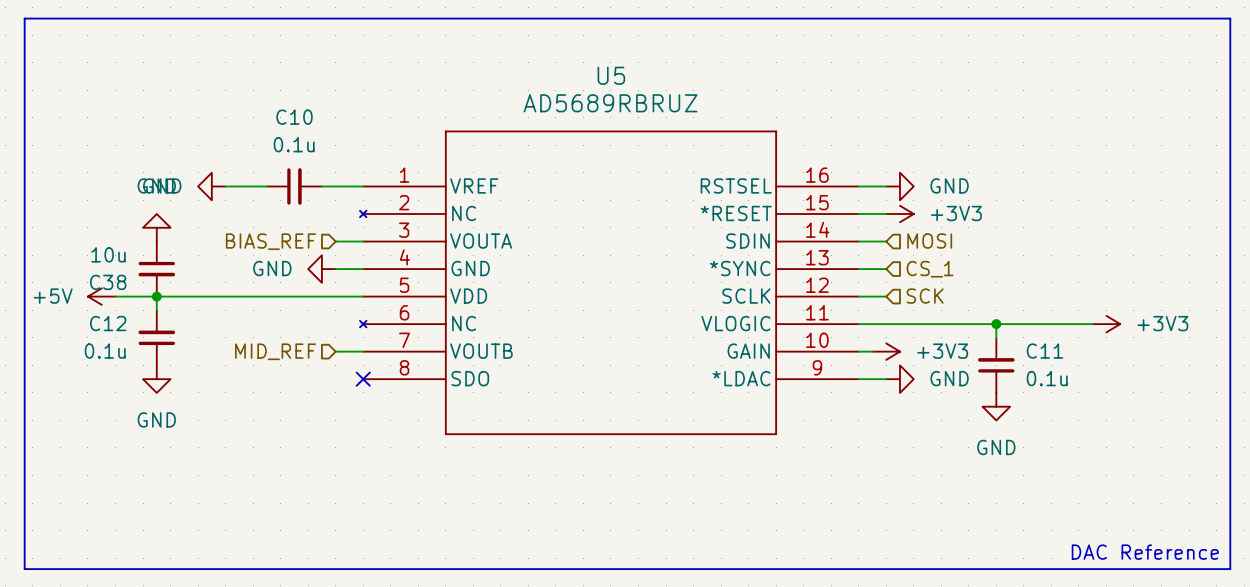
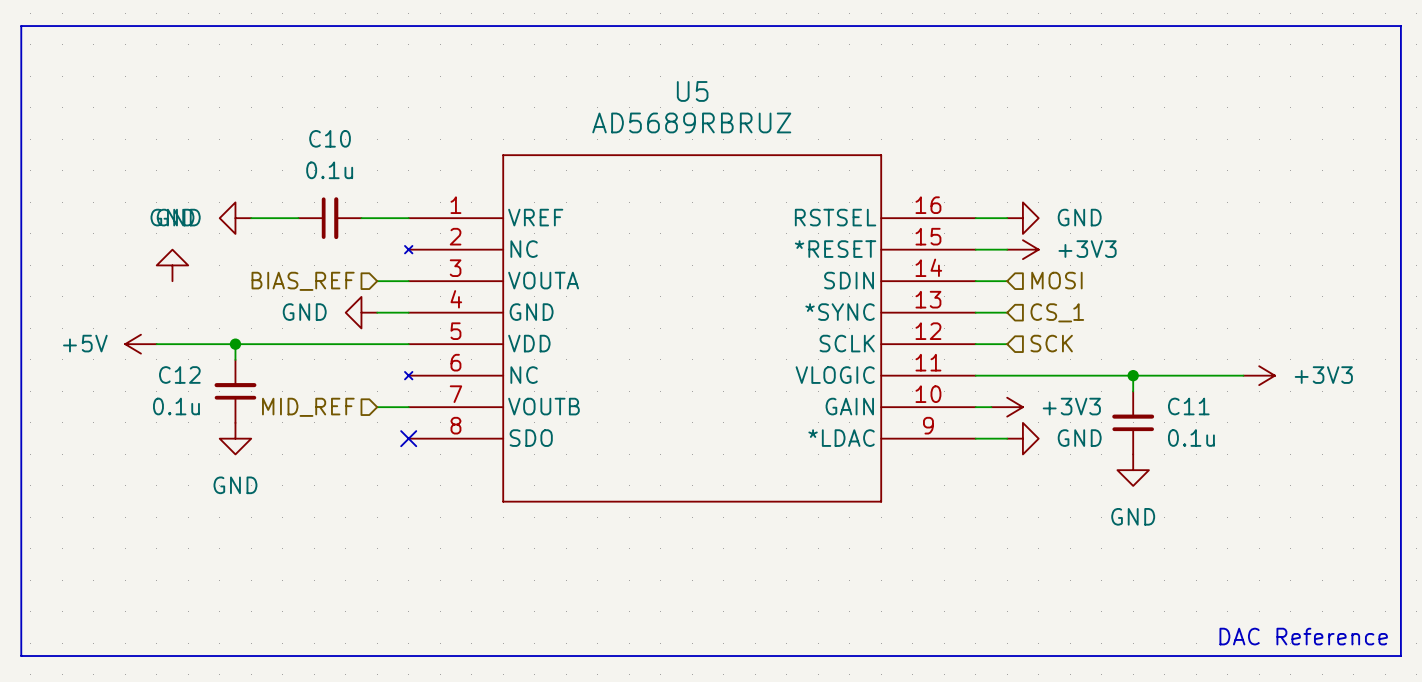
C38: 10u (156, 269) -> none
power symbol position: +5V (101, 296) -> +5V (140, 344)
wire: (156, 296) (156, 310) -> (235, 344) (235, 359)
junction position: (156, 296) -> (235, 344)
C12 position: (156, 337) -> (235, 391)
power symbol position: GND (156, 379) -> GND (235, 438)

